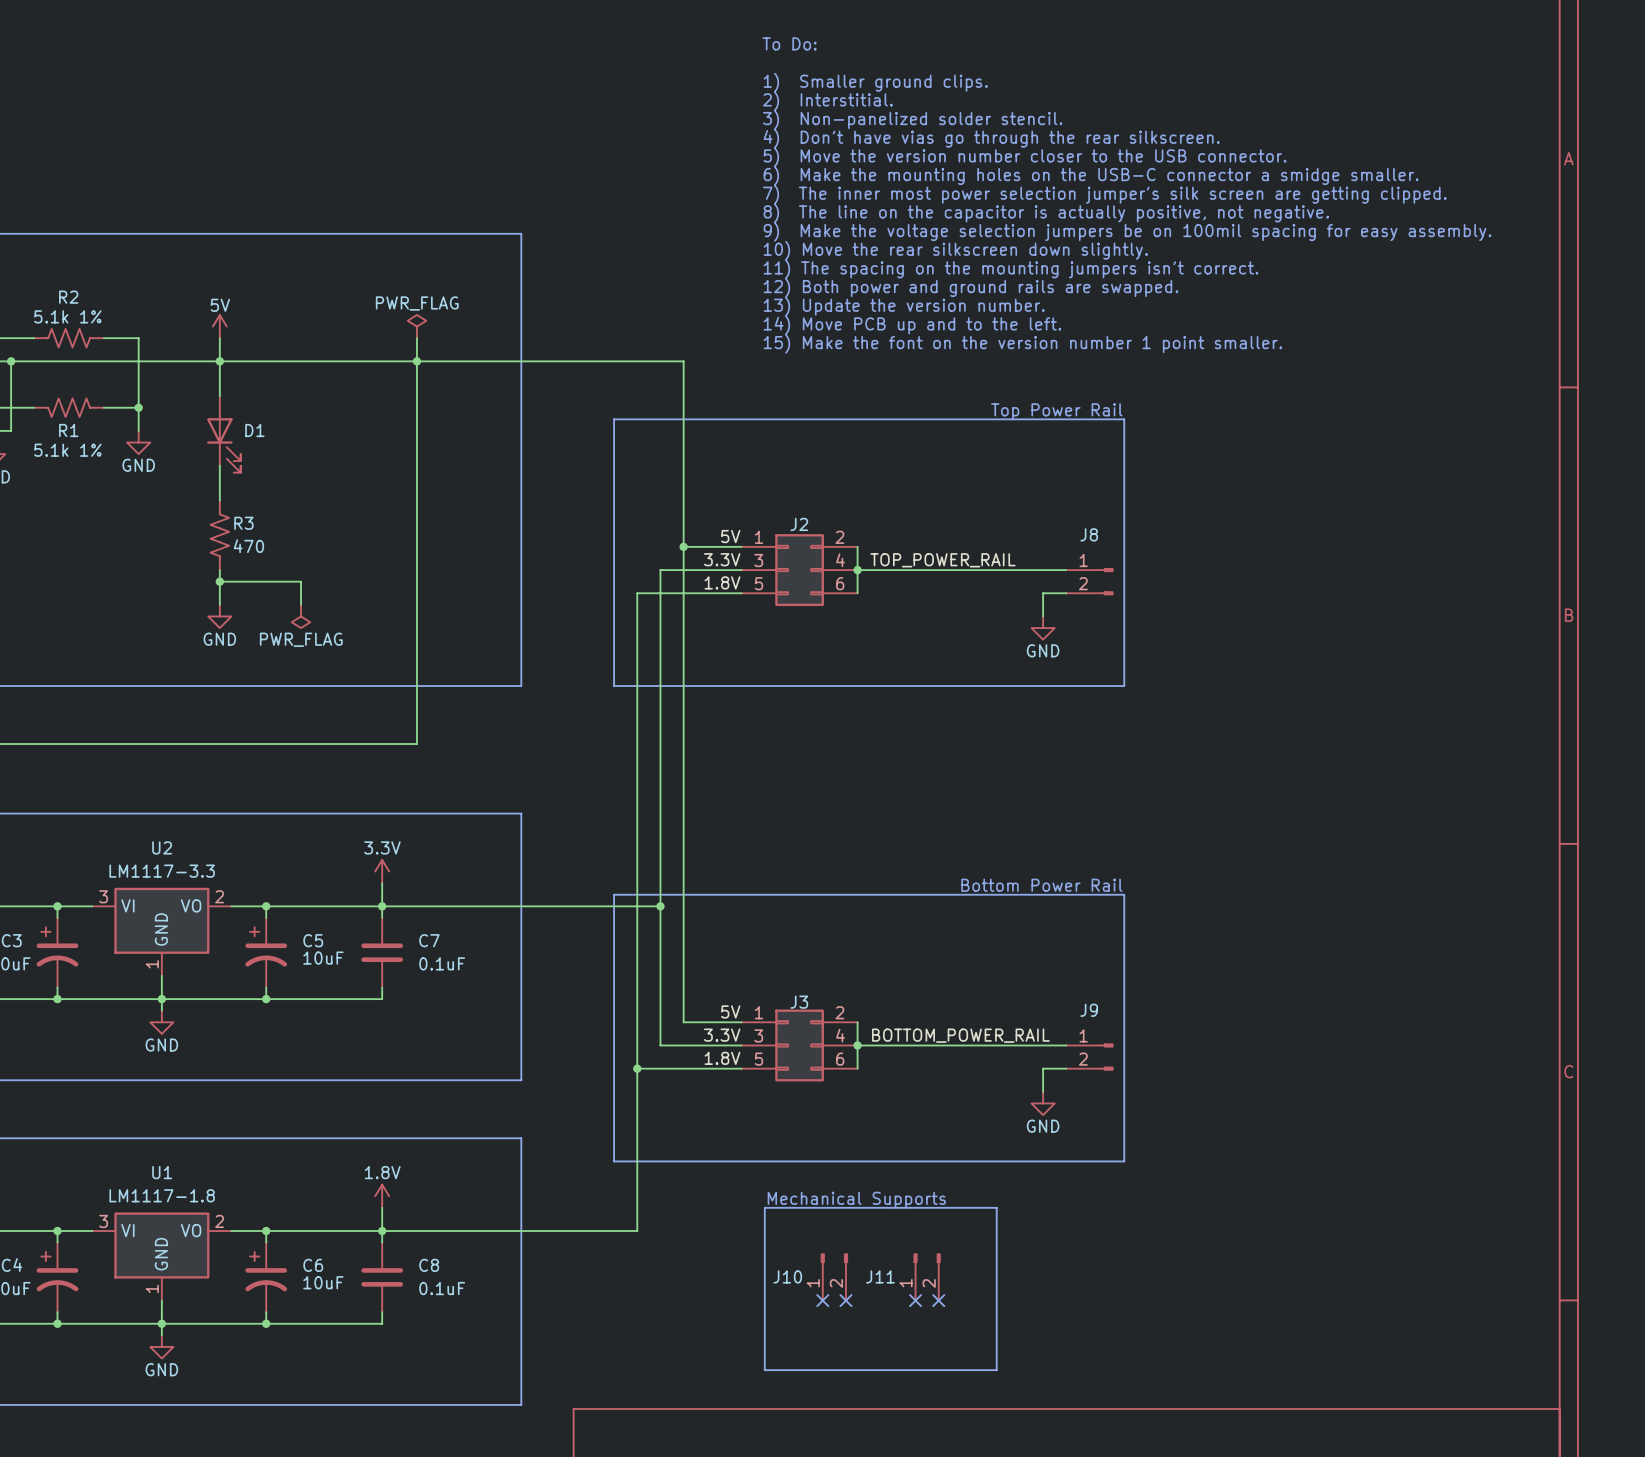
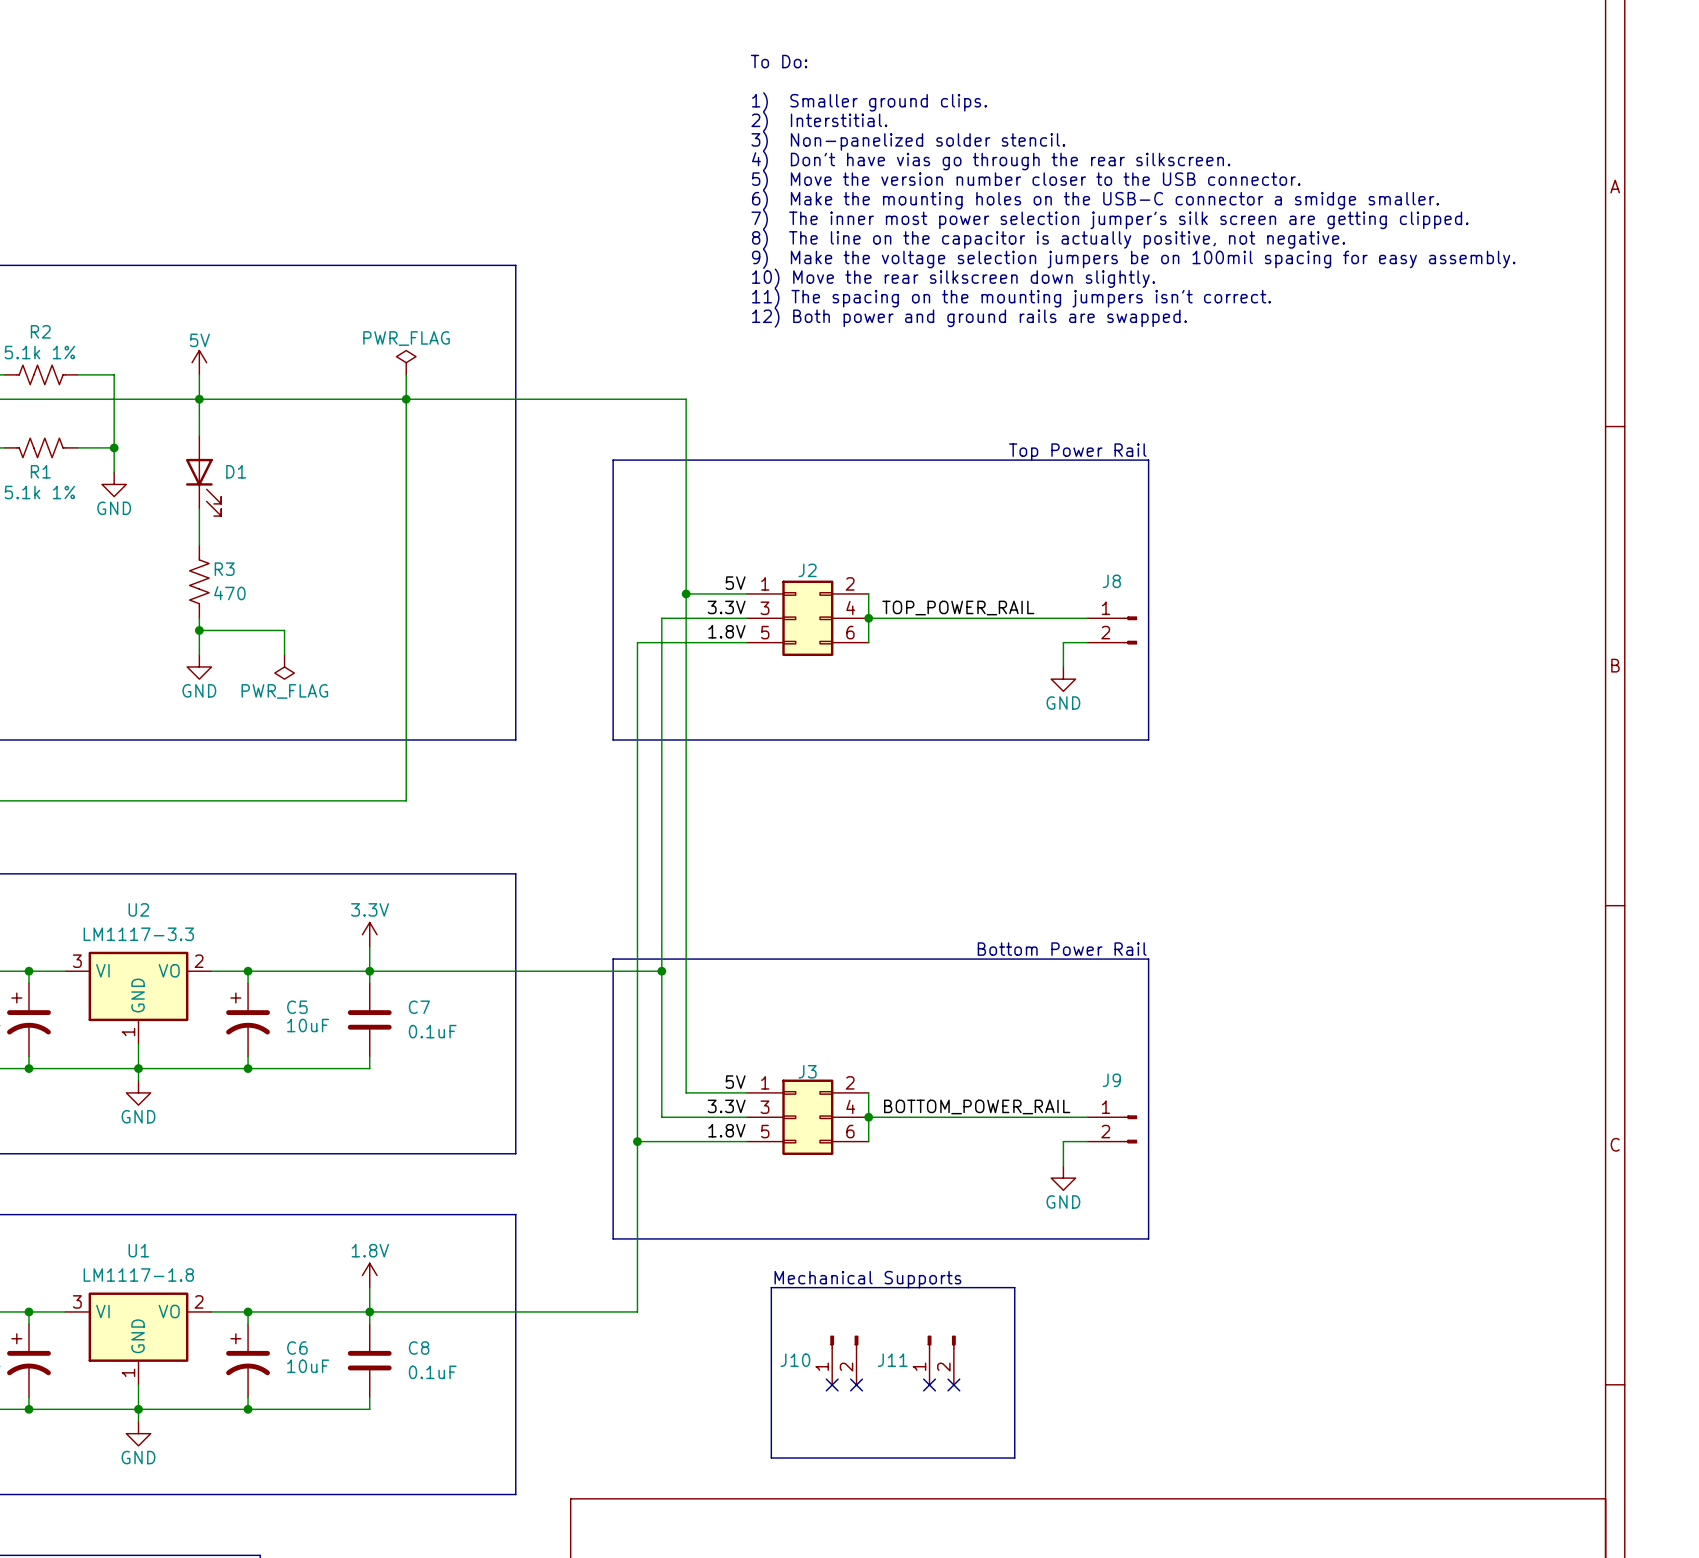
text position: To Do: (789, 43) -> To Do: (779, 61)
text position: 1) Smaller ground clips. (875, 82) -> 1) Smaller ground clips. (869, 102)
text position: 2) Interstitial. (827, 101) -> 2) Interstitial. (819, 121)
text position: 3) Non-panelized solder stencil. (912, 119) -> 3) Non-panelized solder stencil. (908, 141)
text position: 4) Don't have vias go through the rear silkscreen. (991, 138) -> 4) Don't have vias go through the rear silkscreen. (991, 160)
text position: 5) Move the version number closer to the USB connector. (1025, 157) -> 5) Move the version number closer to the USB connector. (1026, 180)
text position: 6) Make the mounting holes on the USB-C connector a smidge smaller. (1091, 175) -> 6) Make the mounting holes on the USB-C connector a smidge smaller. (1095, 200)
text position: 7) The inner most power selection jumper's silk screen are getting clipped. (1104, 194) -> 7) The inner most power selection jumper's silk screen are getting clipped. (1109, 219)
text position: 8) The line on the capacitor is actually positive, not negative. (1046, 213) -> 8) The line on the capacitor is actually positive, not negative. (1048, 239)
text position: 9) Make the voltage selection jumpers be on 100mil spacing for easy assembly. (1127, 231) -> 9) Make the voltage selection jumpers be on 100mil spacing for easy assembly. (1133, 258)
text position: 10) Move the rear silkscreen down slightly. (955, 250) -> 10) Move the rear silkscreen down slightly. (953, 278)
text position: 11) The spacing on the mounting jumpers isn't correct. (1011, 269) -> 11) The spacing on the mounting jumpers isn't correct. (1011, 298)
text position: 12) Both power and ground rails are swapped. (970, 287) -> 12) Both power and ground rails are swapped. (969, 317)
text: 13) Update the version number. (904, 306) -> none
text: 14) Move PCB up and to the left. (912, 325) -> none
text: 15) Make the font on the version number 1 point smaller. (1022, 343) -> none

